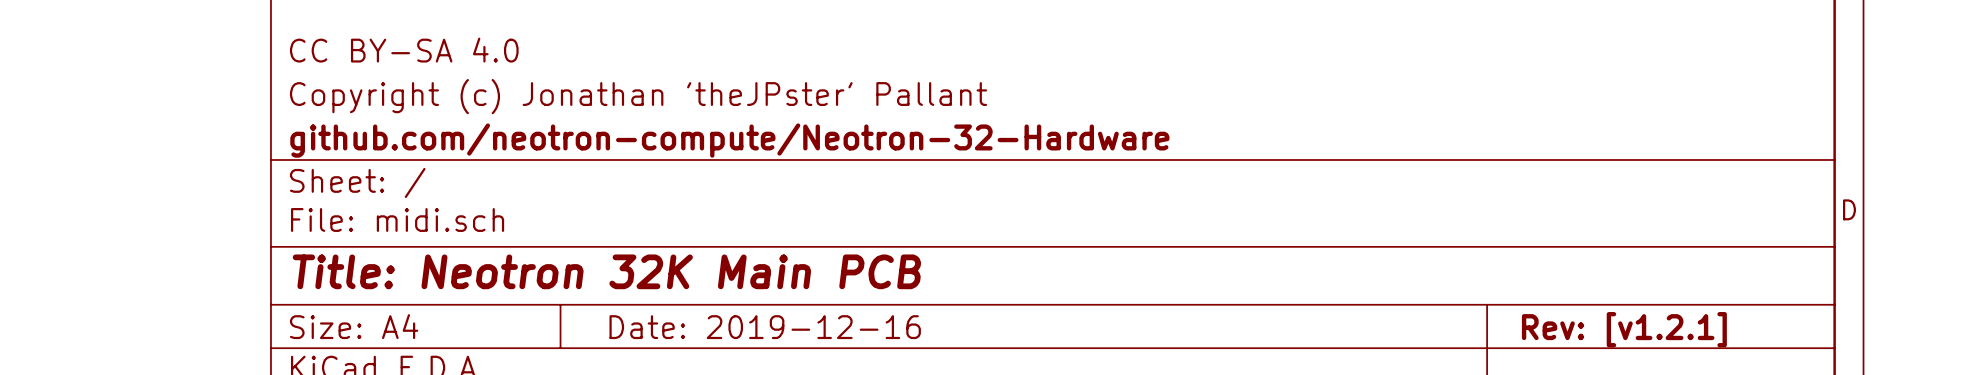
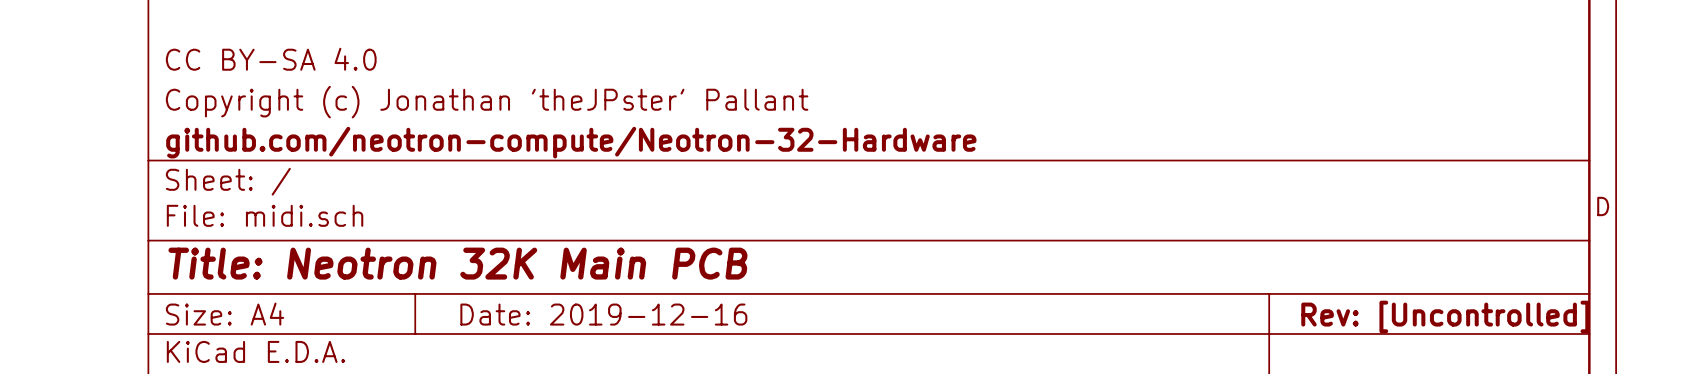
title block: Rev: [v1.2.1] (1624, 329) -> Rev: [Uncontrolled] (1445, 316)

